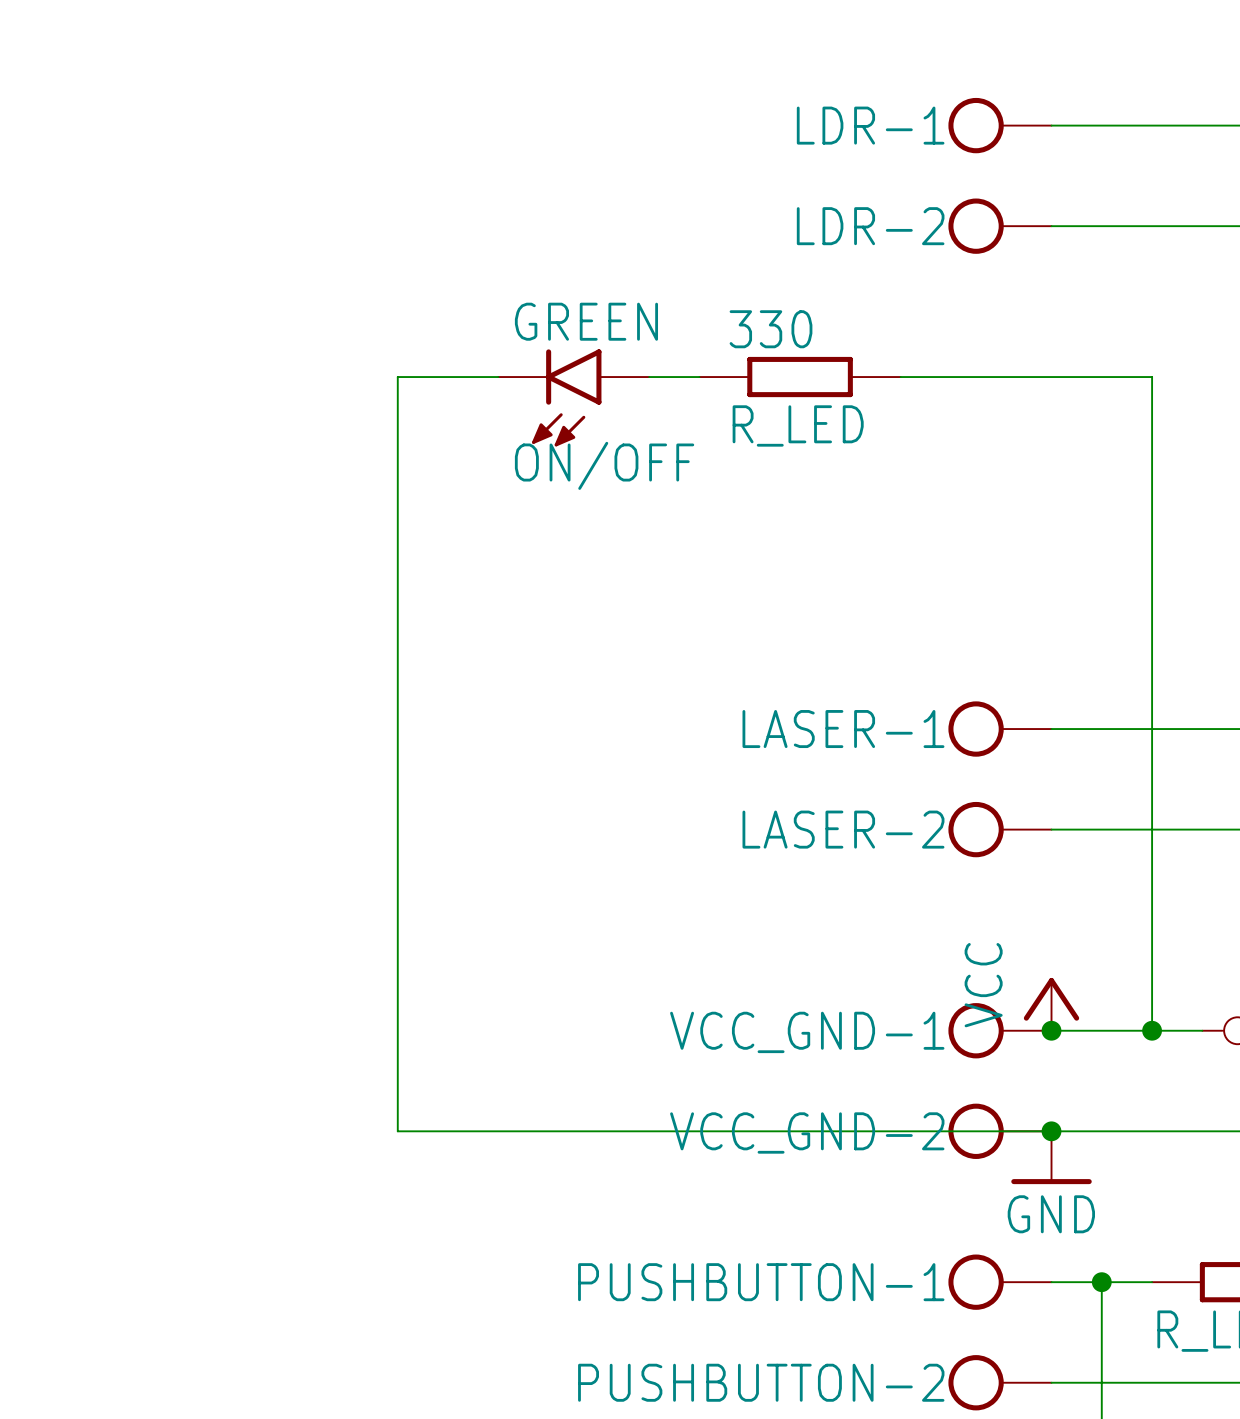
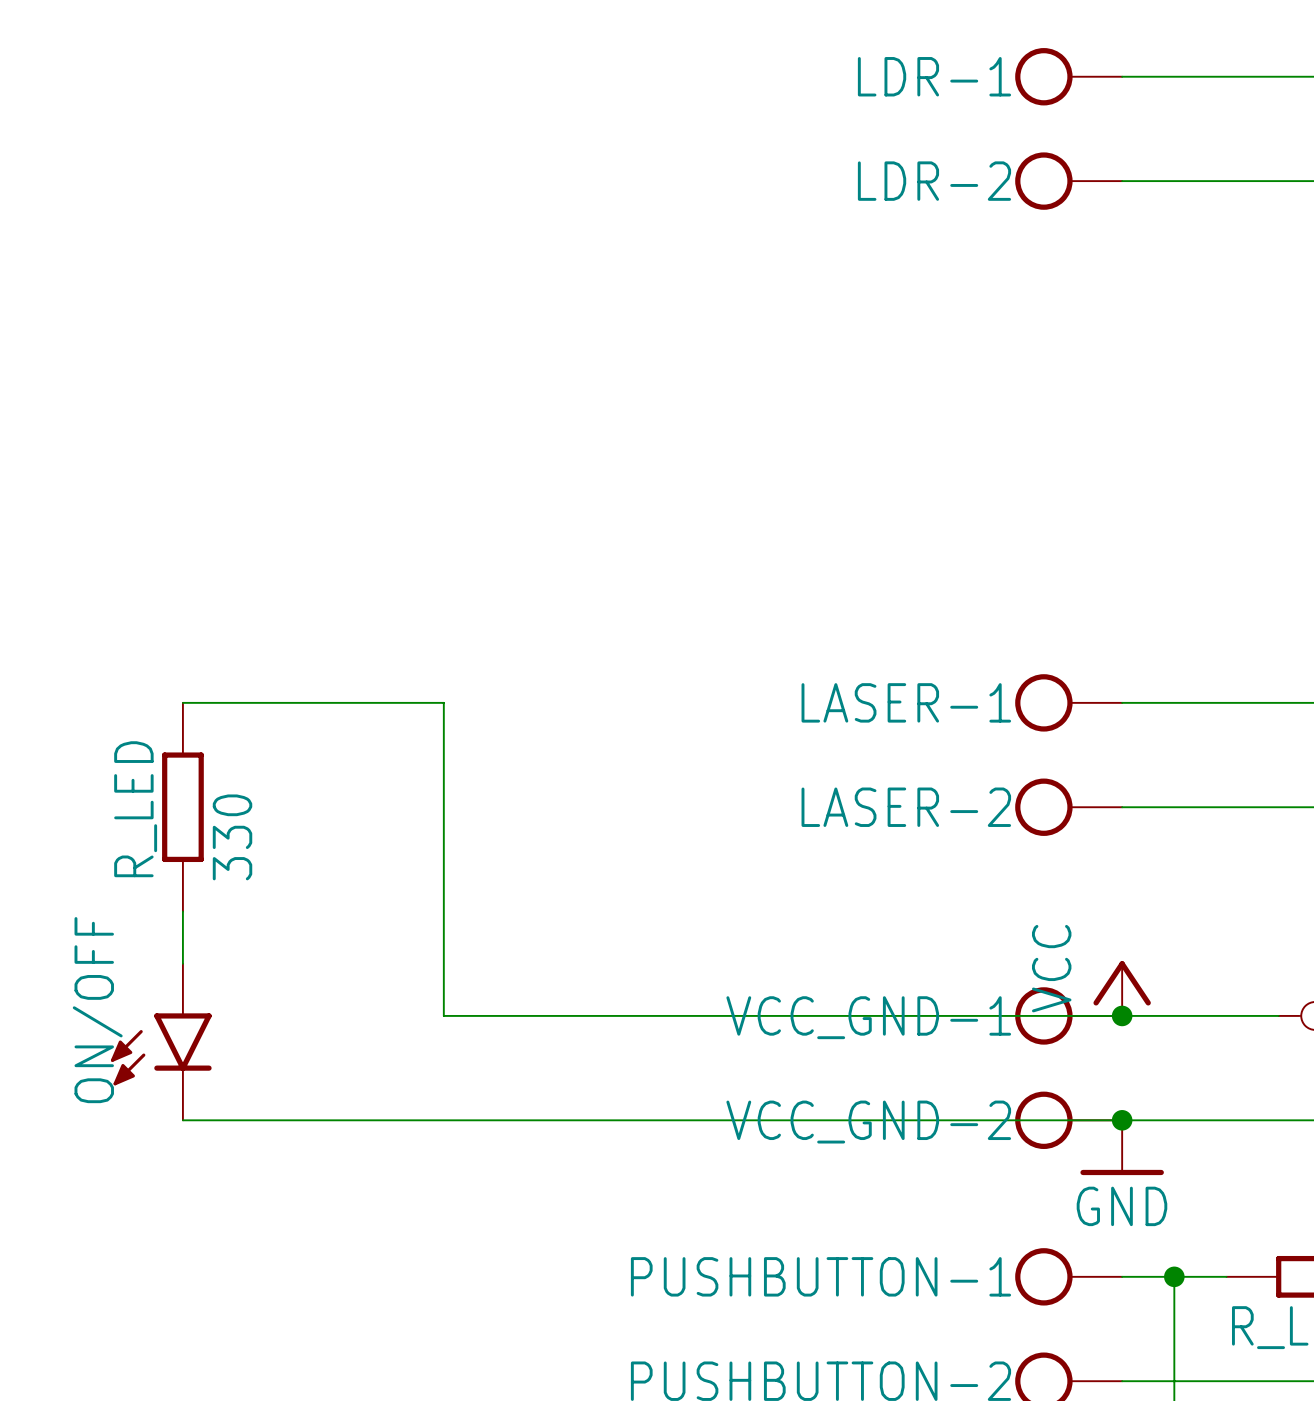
wire: (498, 377) (397, 377) (397, 729) -> (182, 702) (443, 702)
wire: (649, 377) (699, 377) -> none
R_LED: 330 (800, 377) -> none
wire: (900, 377) (1152, 377) (1152, 1030) -> none
ON/OFF: GREEN (573, 397) -> none
R_LED: none -> 330 (182, 807)
wire: none -> (182, 911) (182, 963)
wire: (397, 1030) (397, 1131) -> (182, 1120) (443, 1120)
wire: none -> (443, 1015) (1122, 1015)
junction: (1152, 1030) -> none
ON/OFF: none -> (161, 1042)

